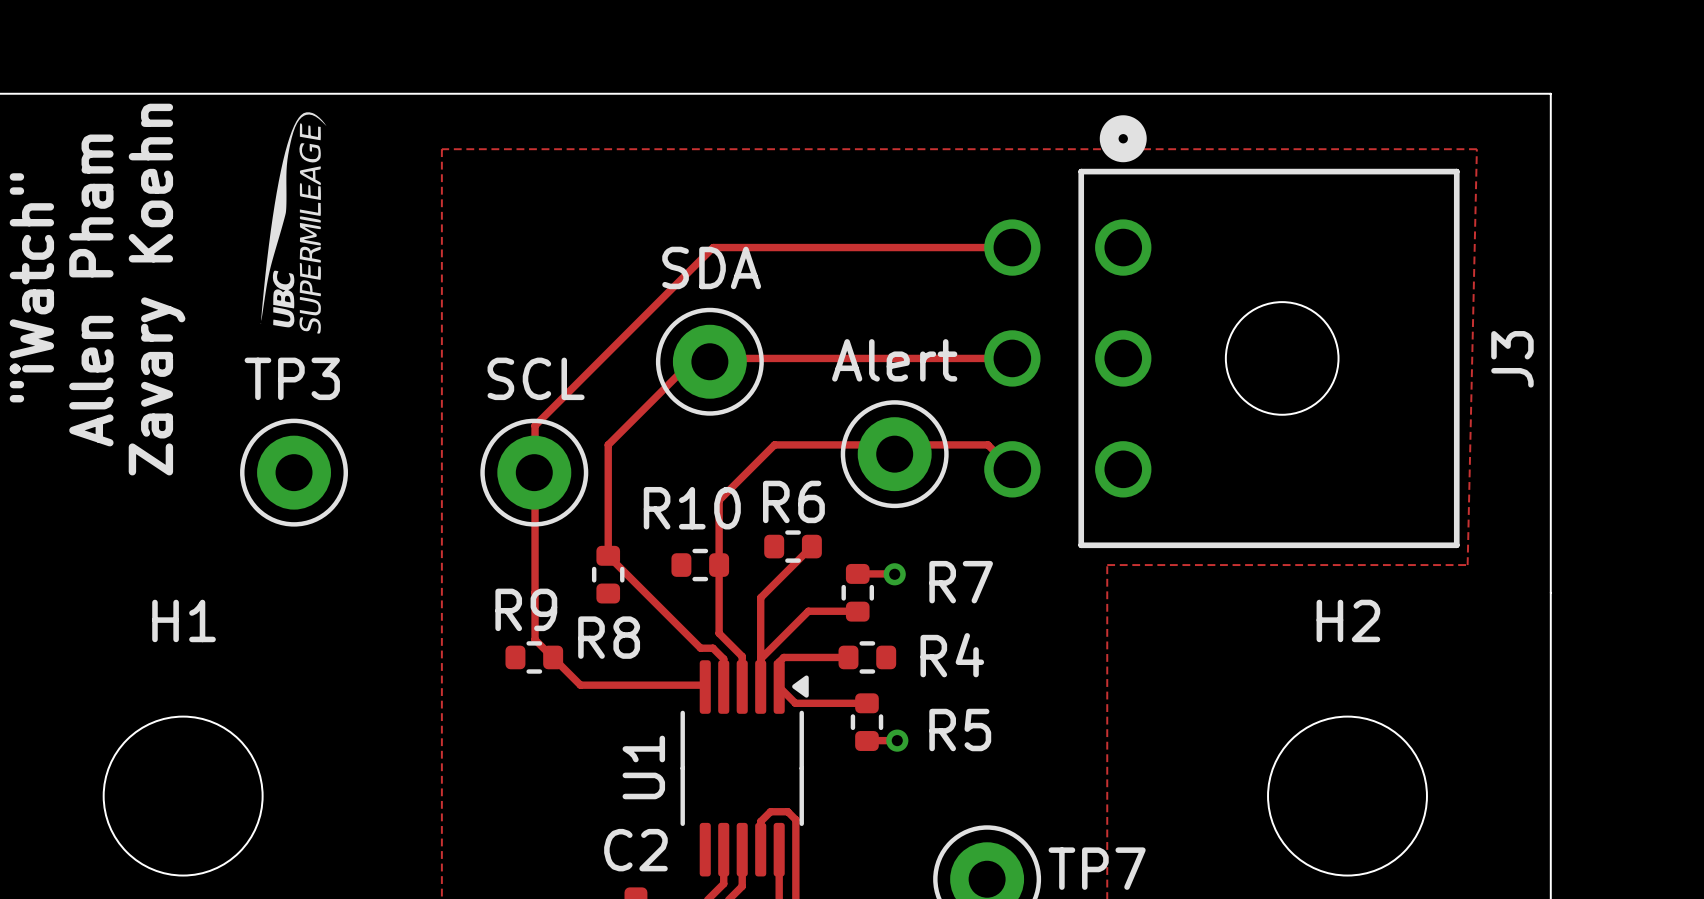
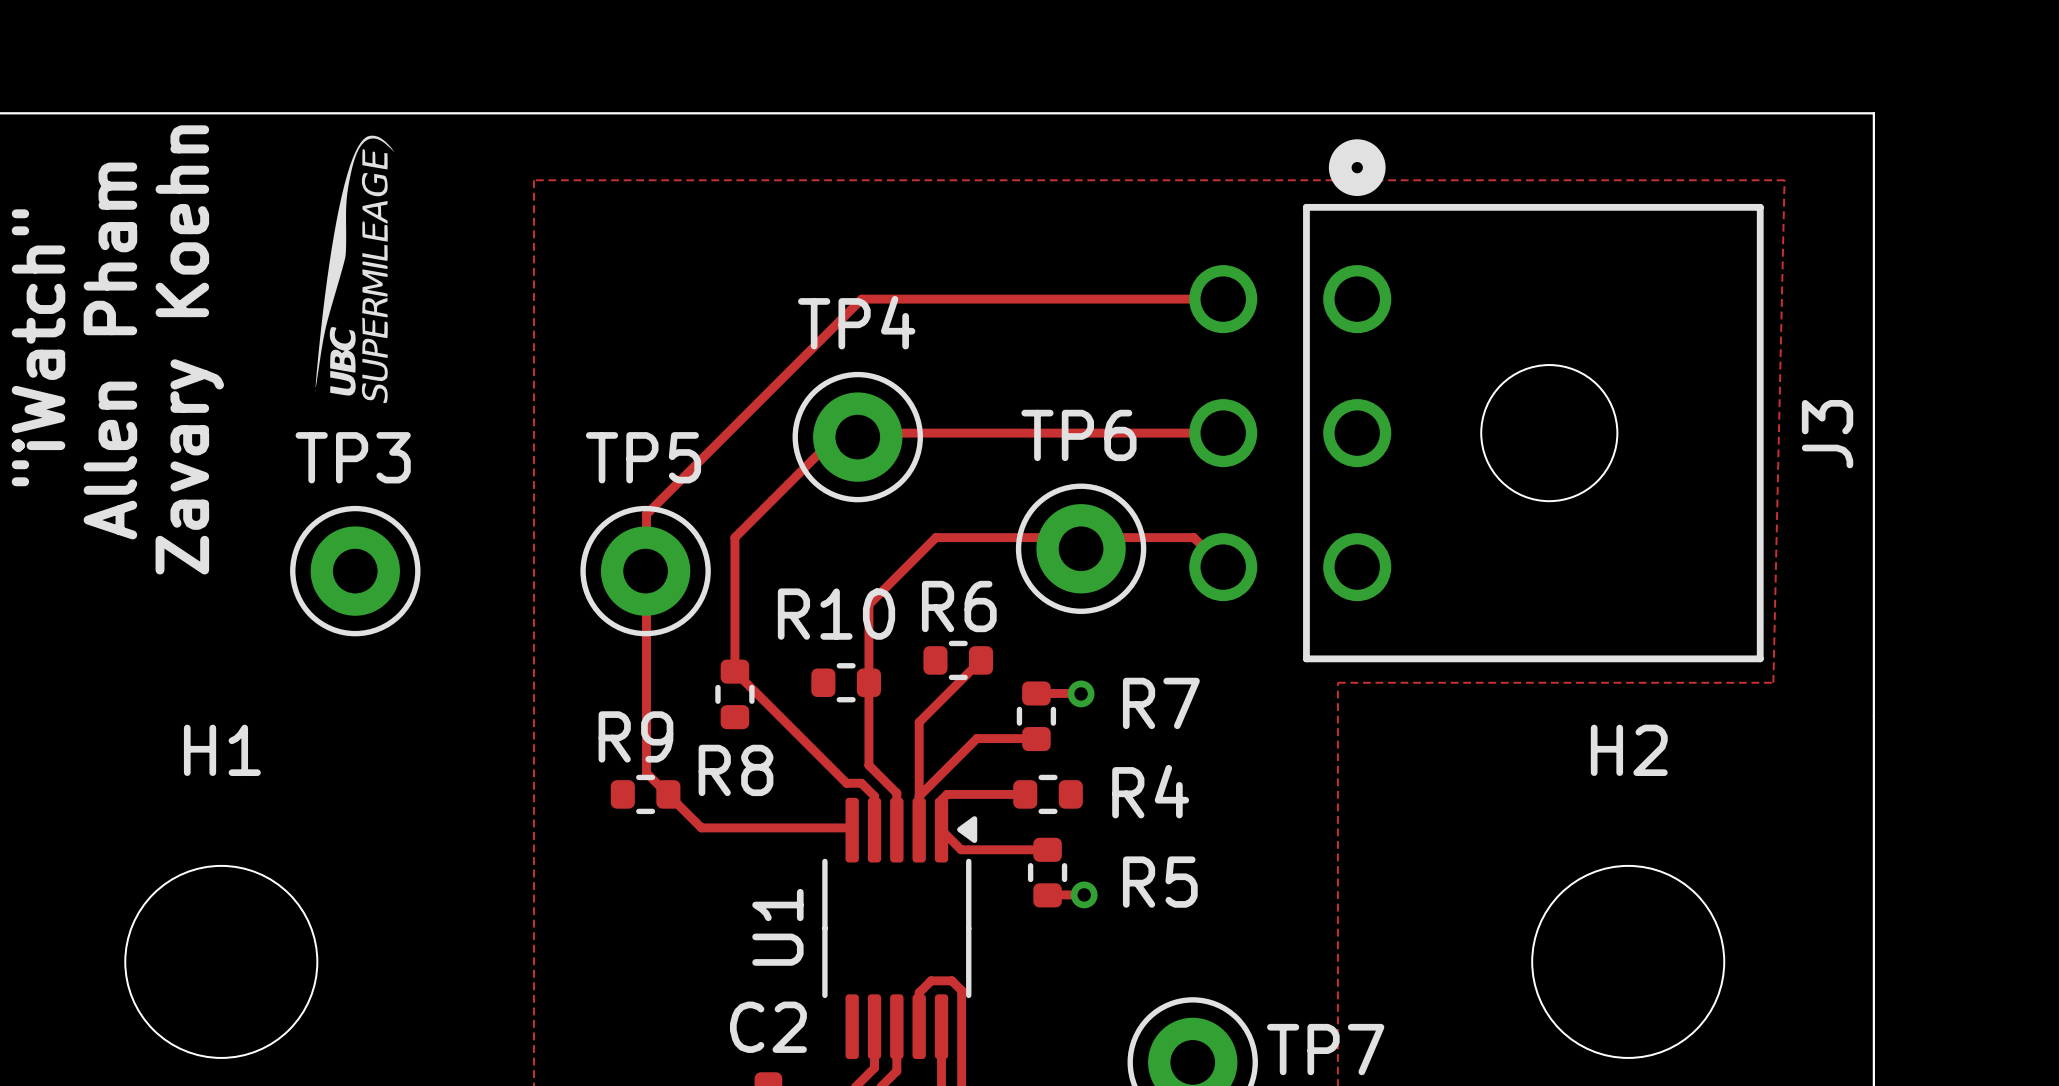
SDA name: SDA (711, 267) -> TP4 (856, 322)
Alert name: Alert (894, 360) -> TP6 (1078, 435)
SCL name: SCL (536, 378) -> TP5 (643, 457)

